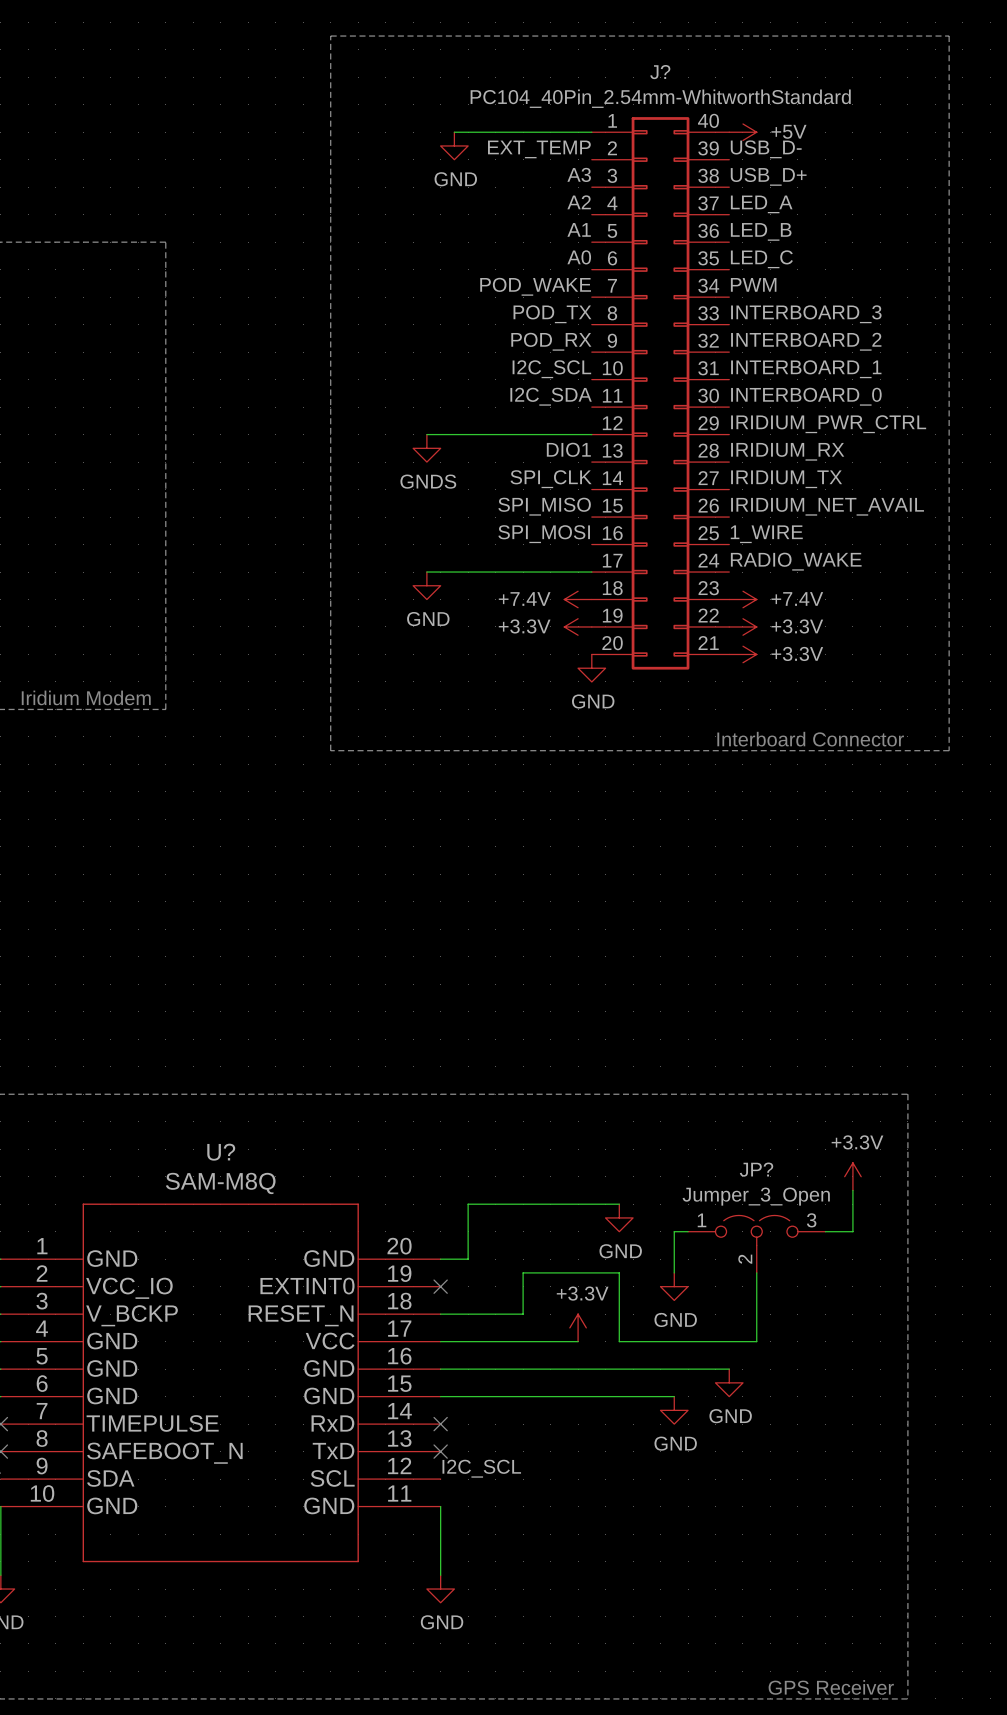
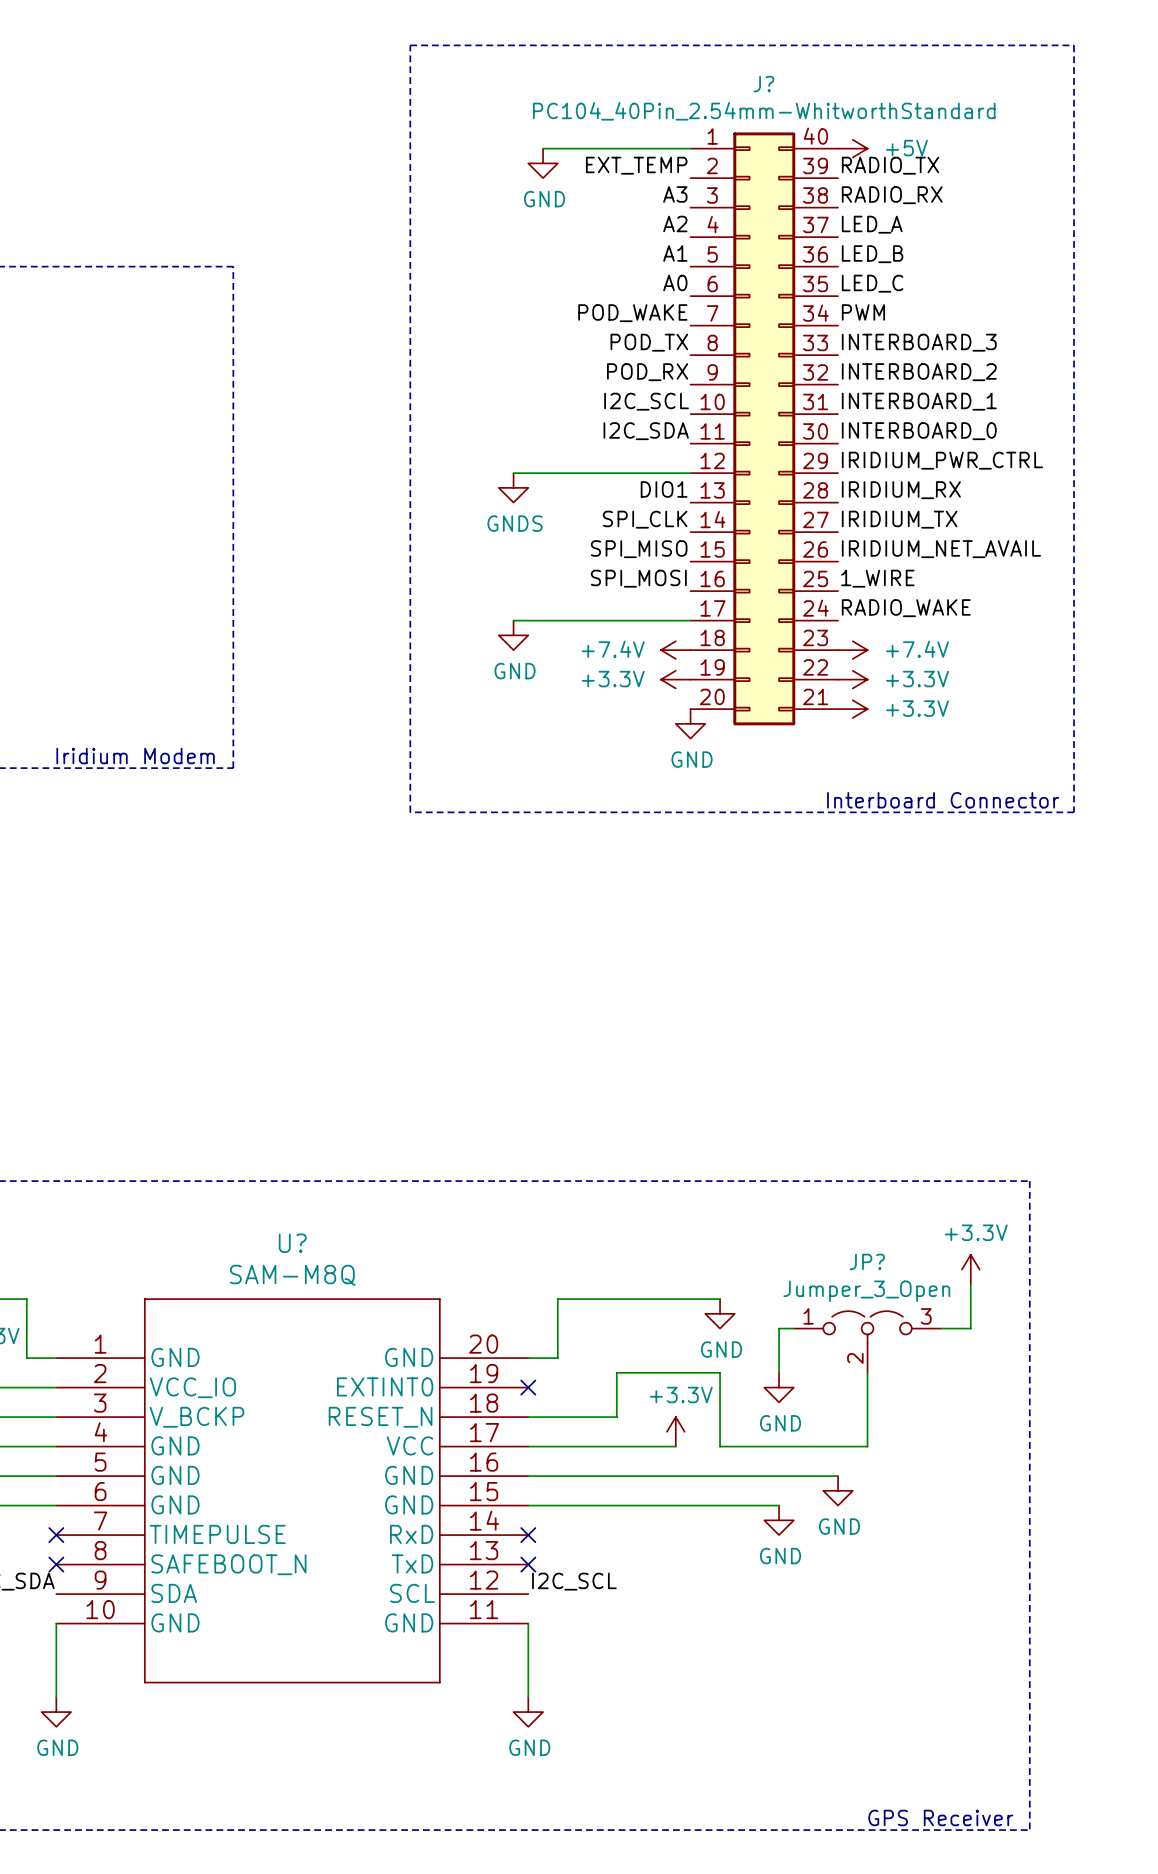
label: USB_D- (766, 149) -> RADIO_TX (890, 165)
label: USB_D+ (768, 176) -> RADIO_RX (892, 195)

